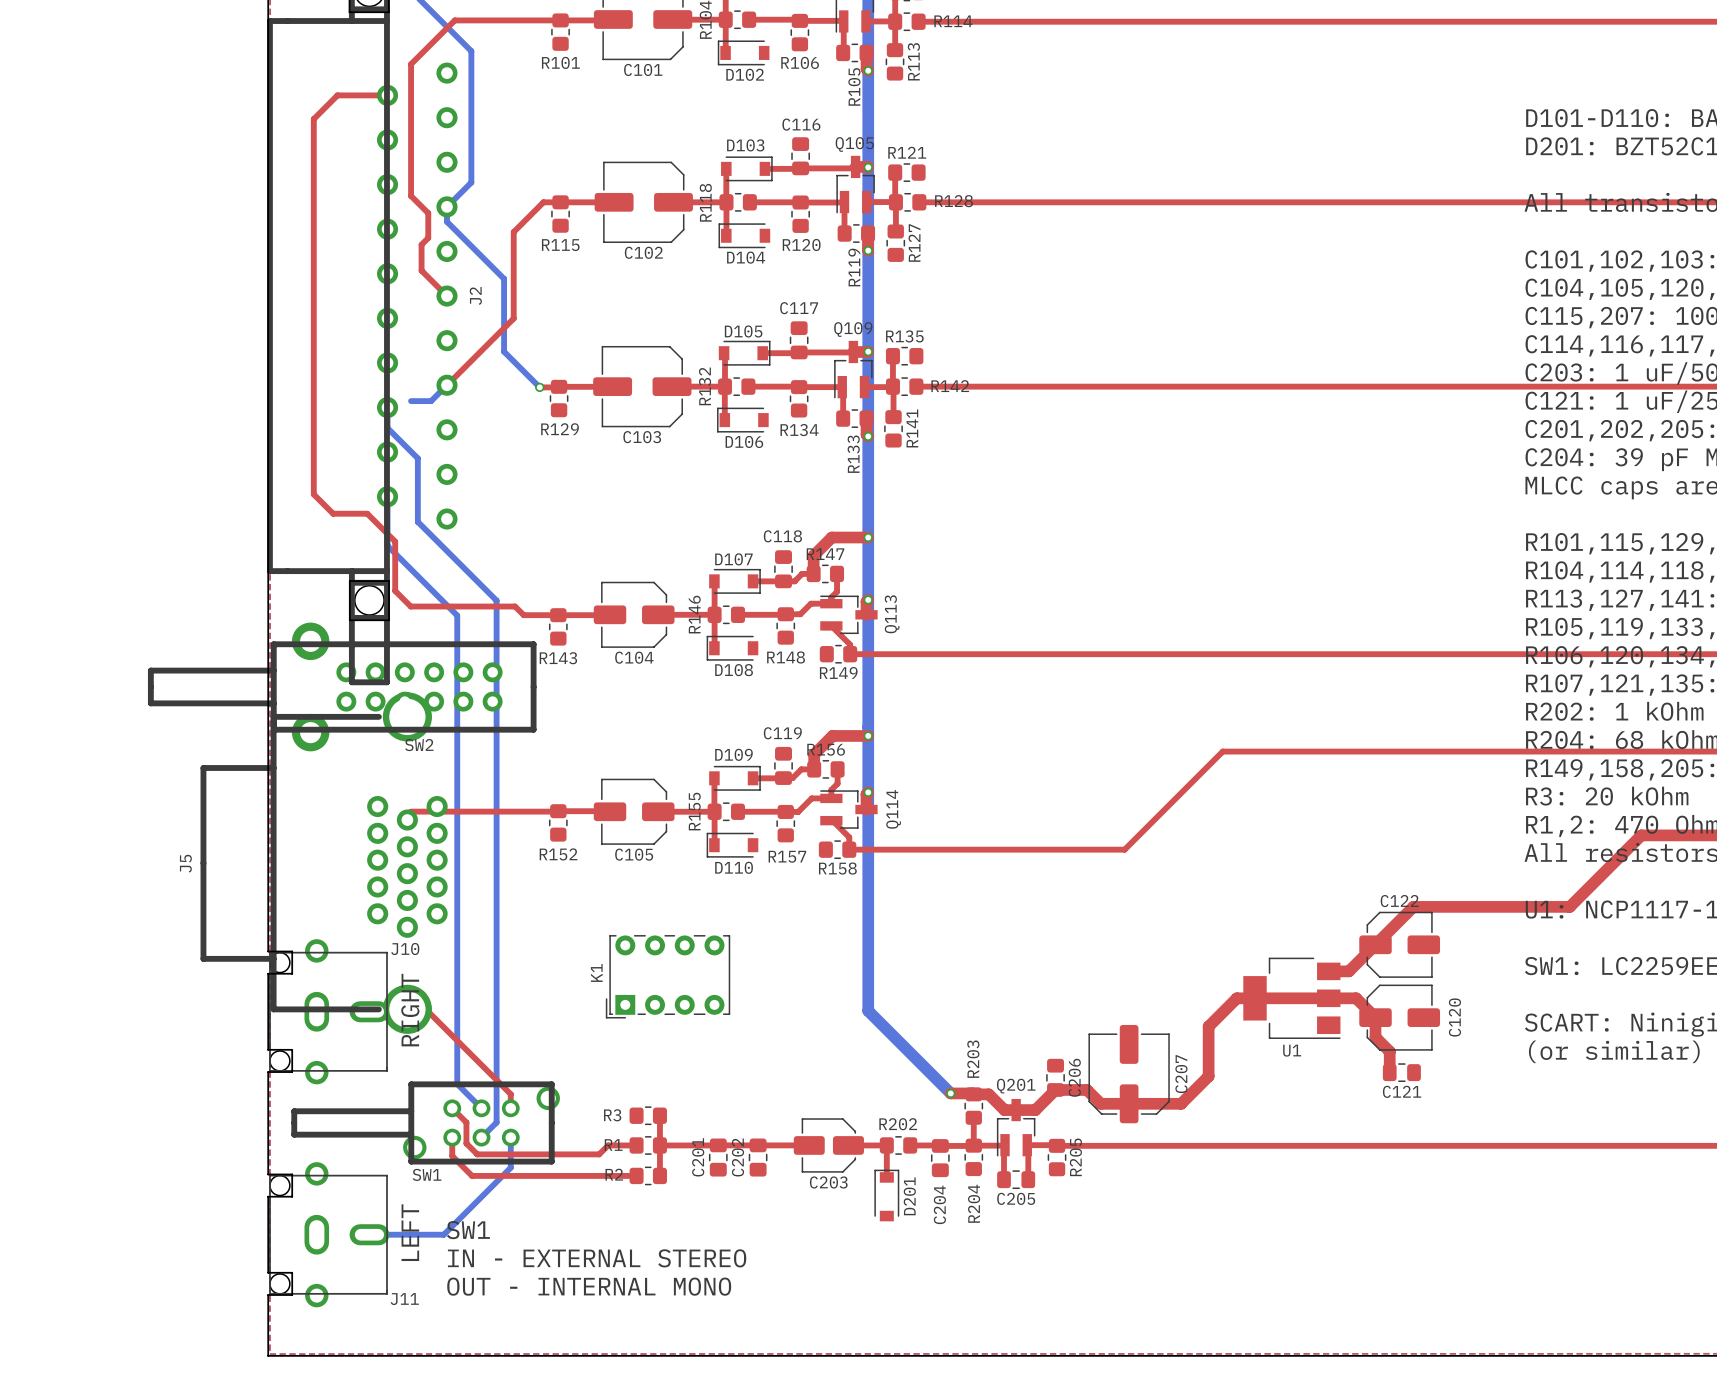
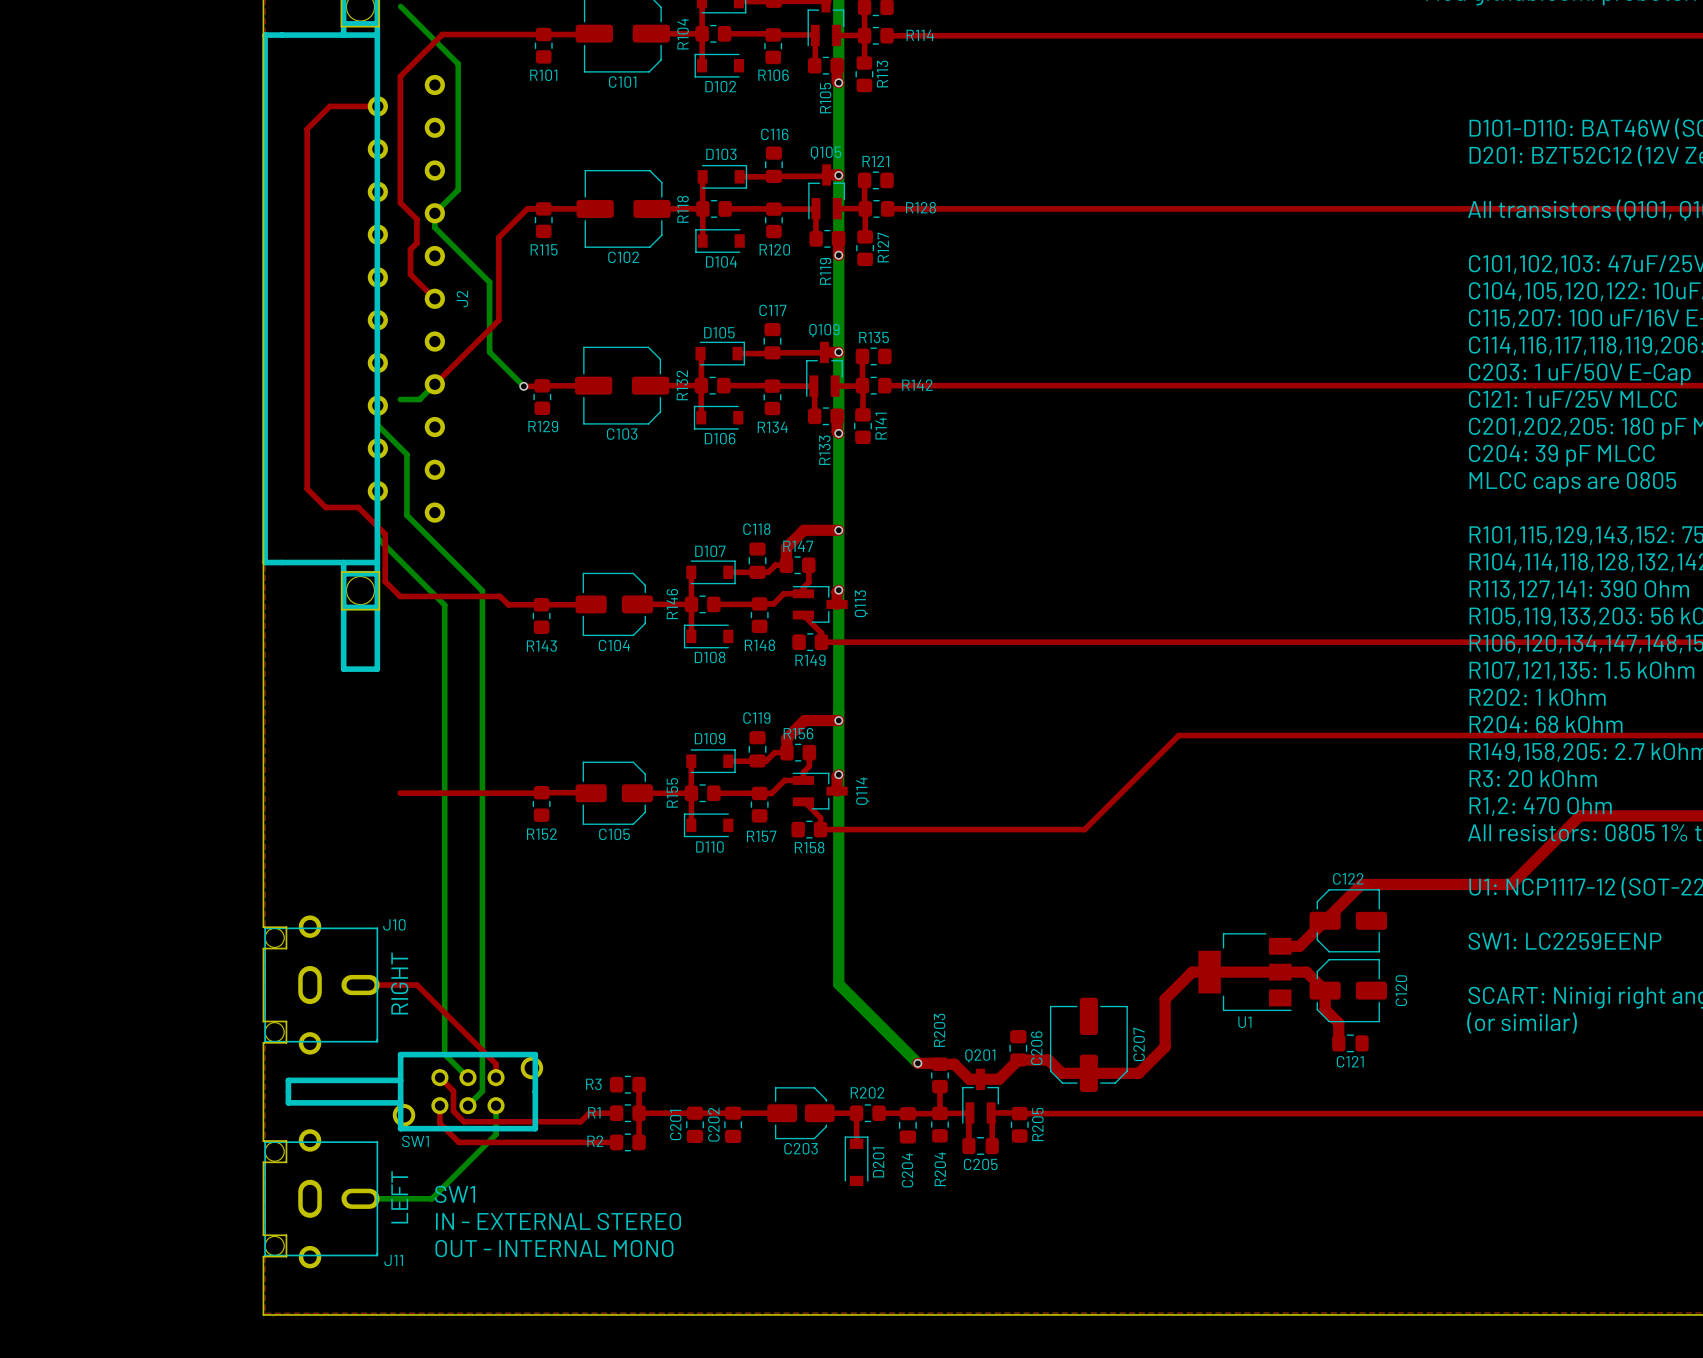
SW2: (342, 686) -> none
J5: (324, 863) -> none
K1: (668, 976) -> none

